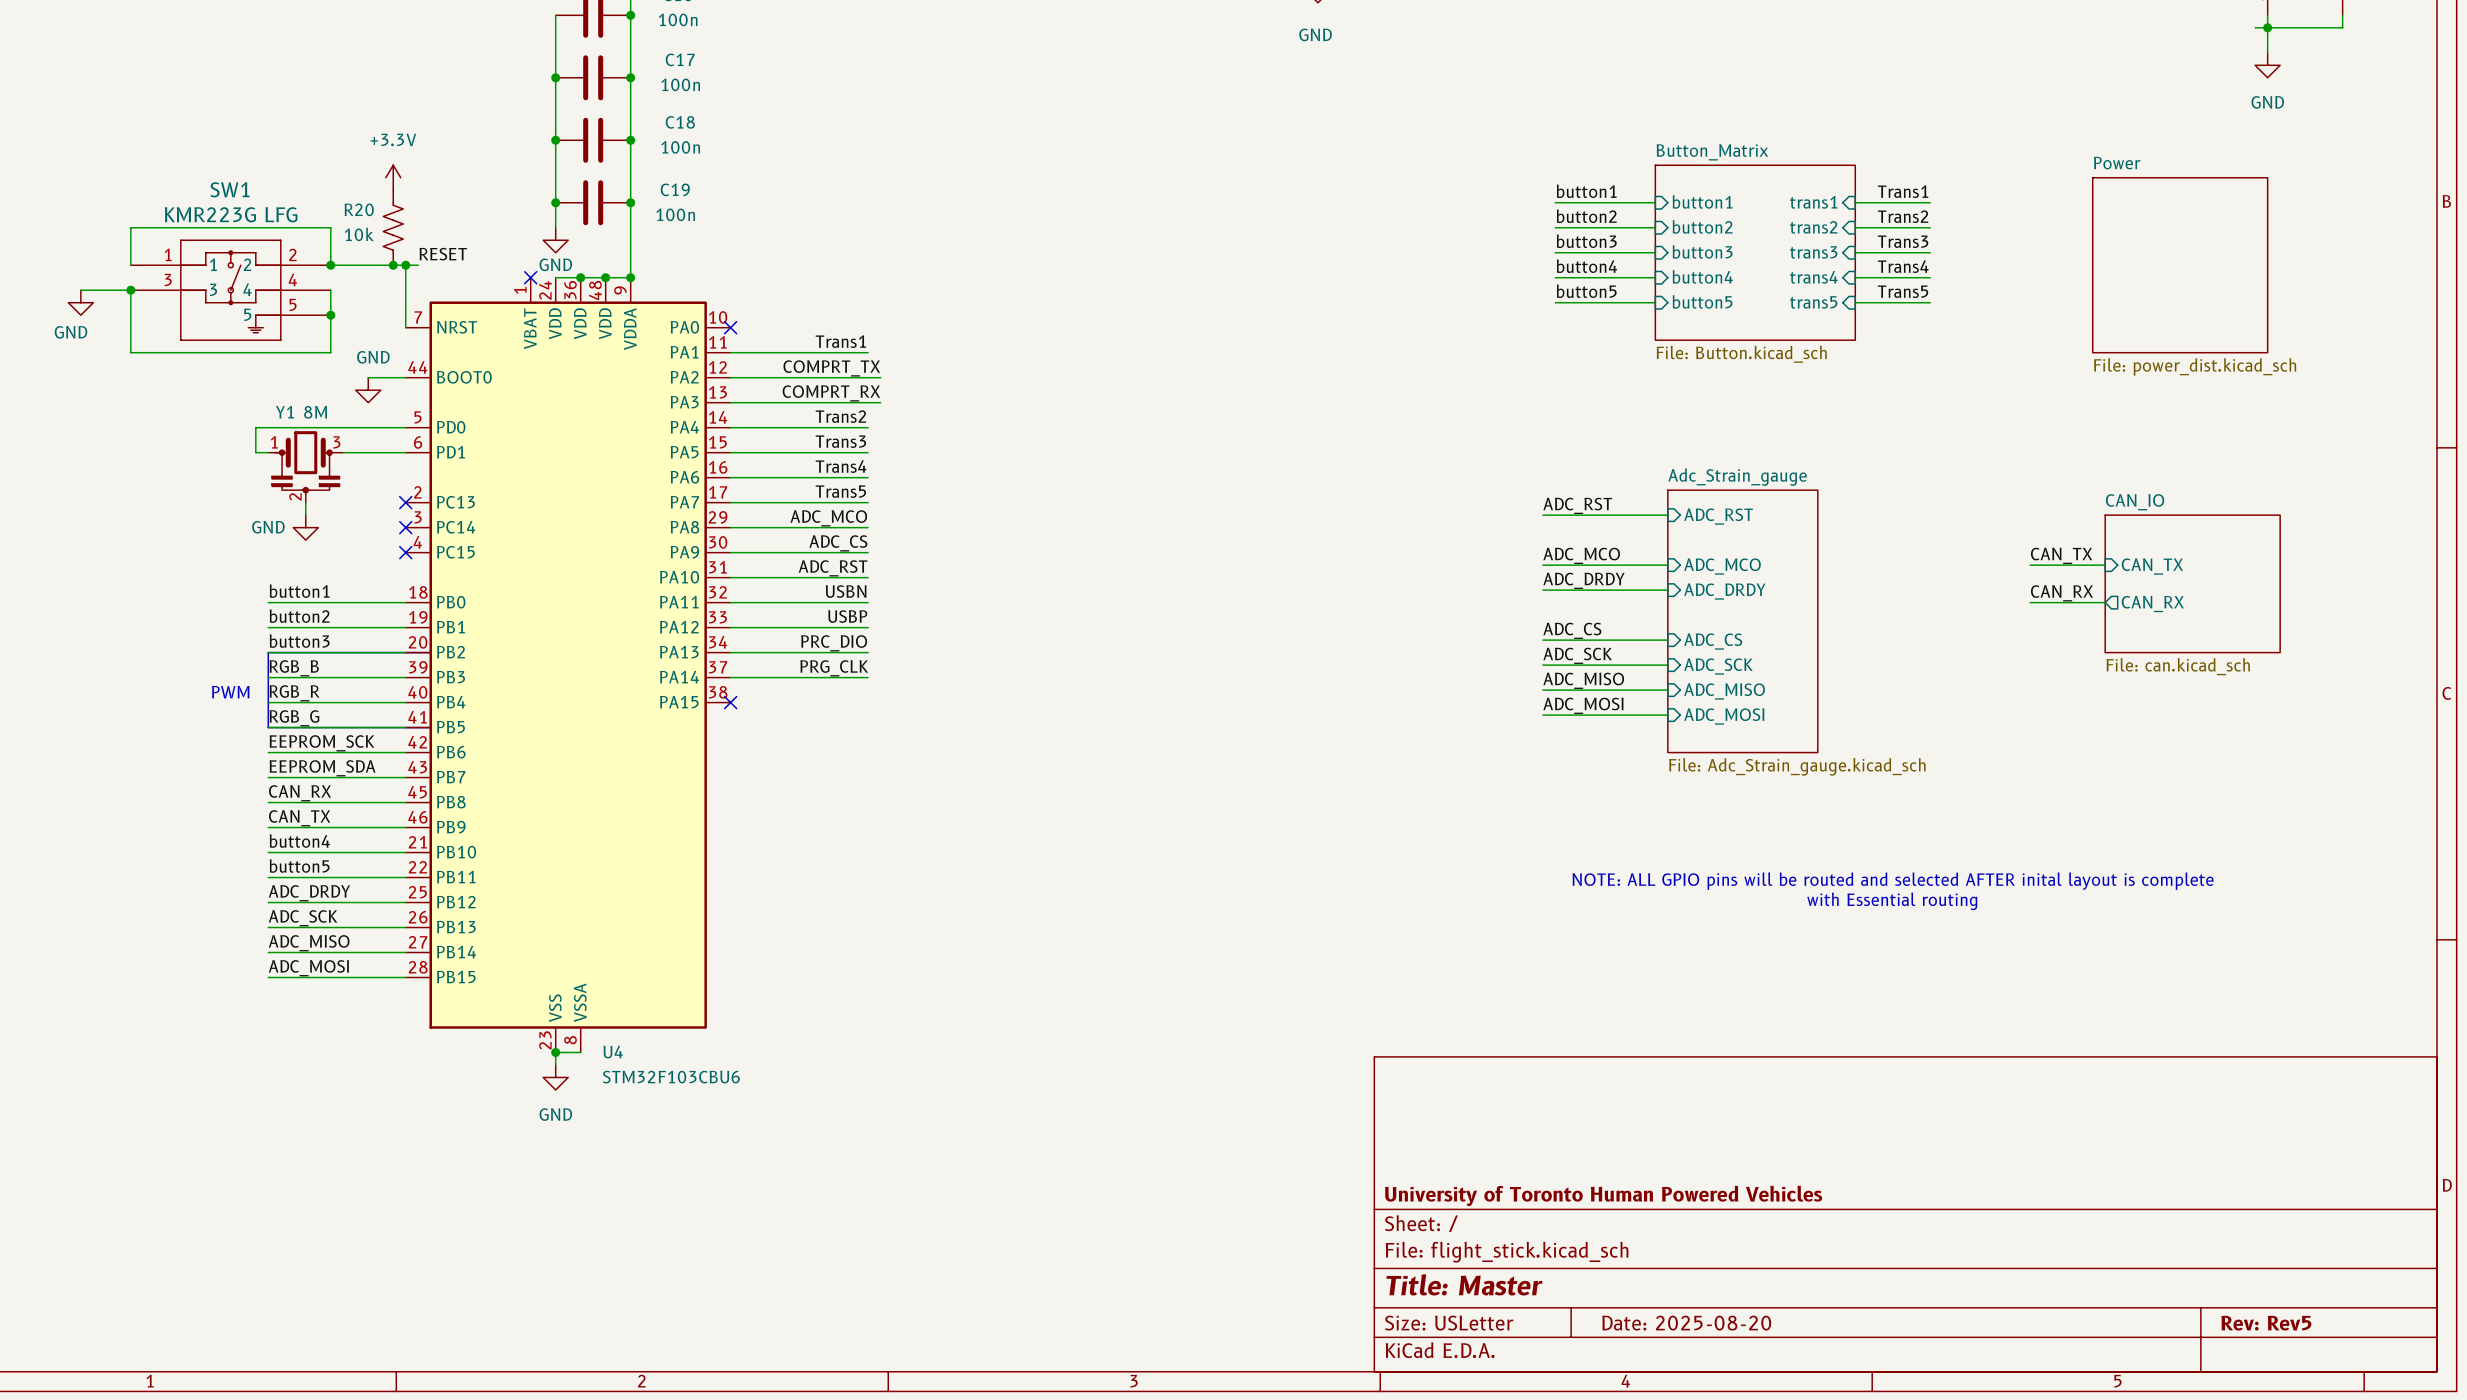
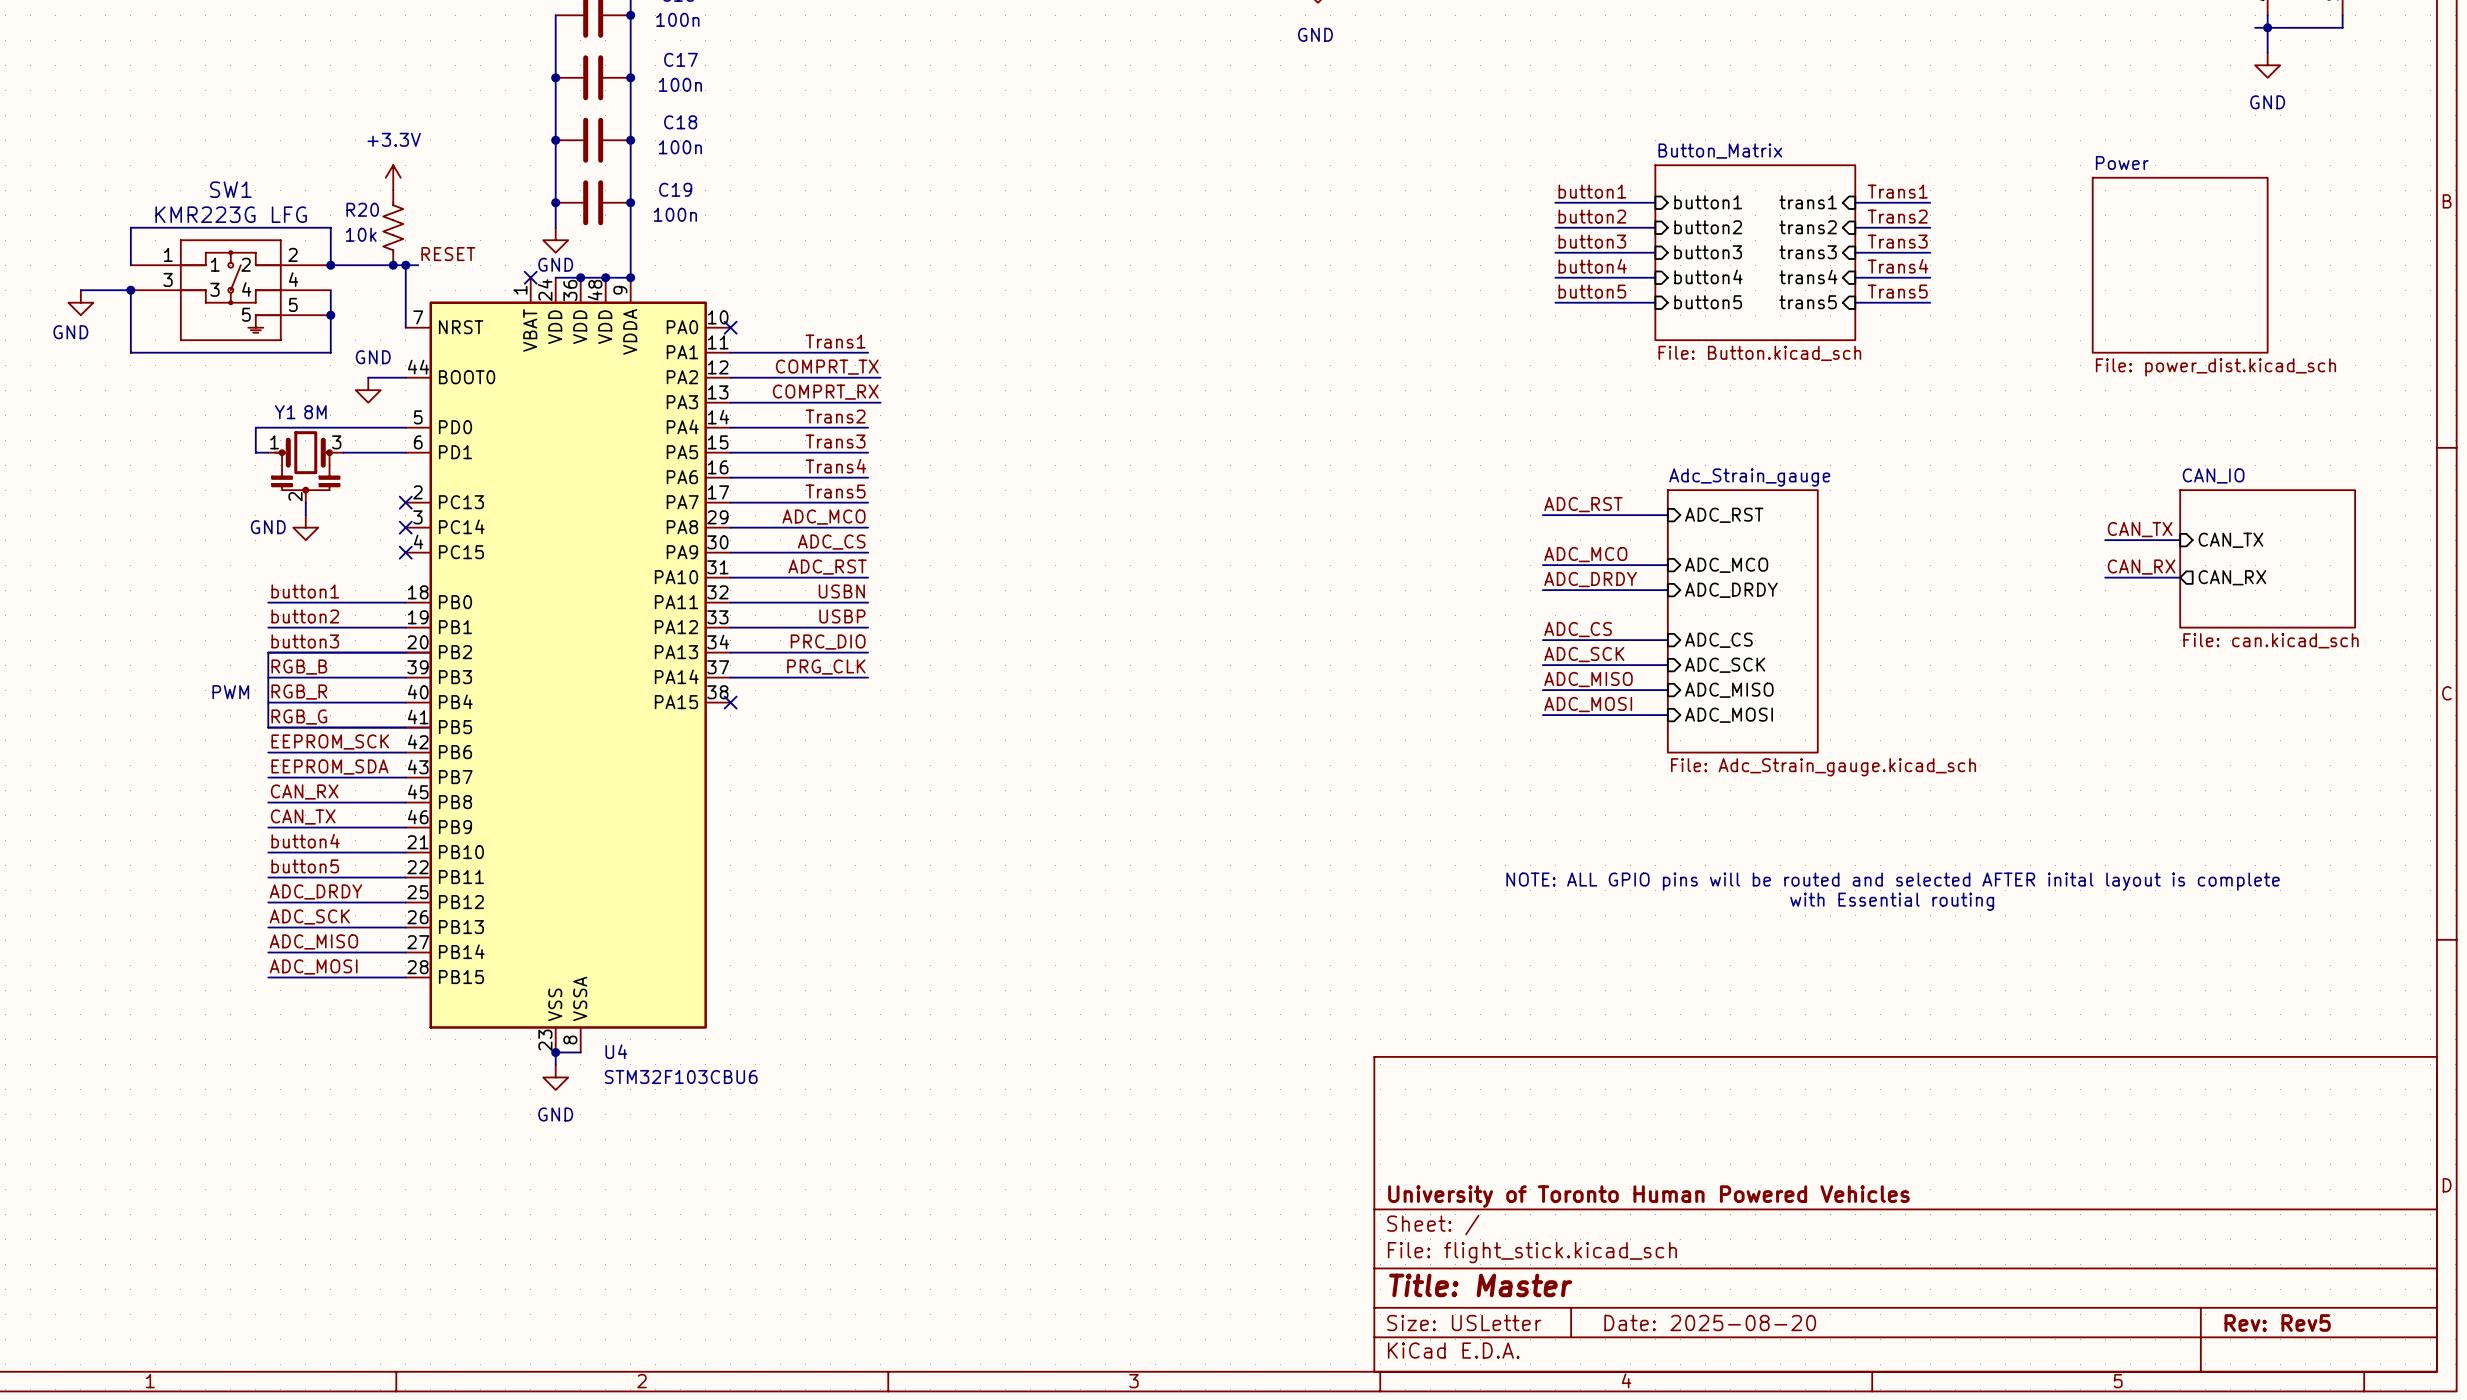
label position: CAN_TX (2061, 555) -> CAN_TX (2140, 529)
wire: (2030, 565) (2105, 565) -> (2105, 577) (2180, 577)
sheet pin position: CAN_TX (2152, 566) -> CAN_TX (2230, 540)
sheet CAN_IO position: (2192, 583) -> (2267, 558)
label position: CAN_RX (2061, 593) -> CAN_RX (2141, 567)
wire: (2030, 602) (2105, 602) -> (2105, 540) (2180, 540)
sheet pin position: CAN_RX (2152, 604) -> CAN_RX (2232, 577)

